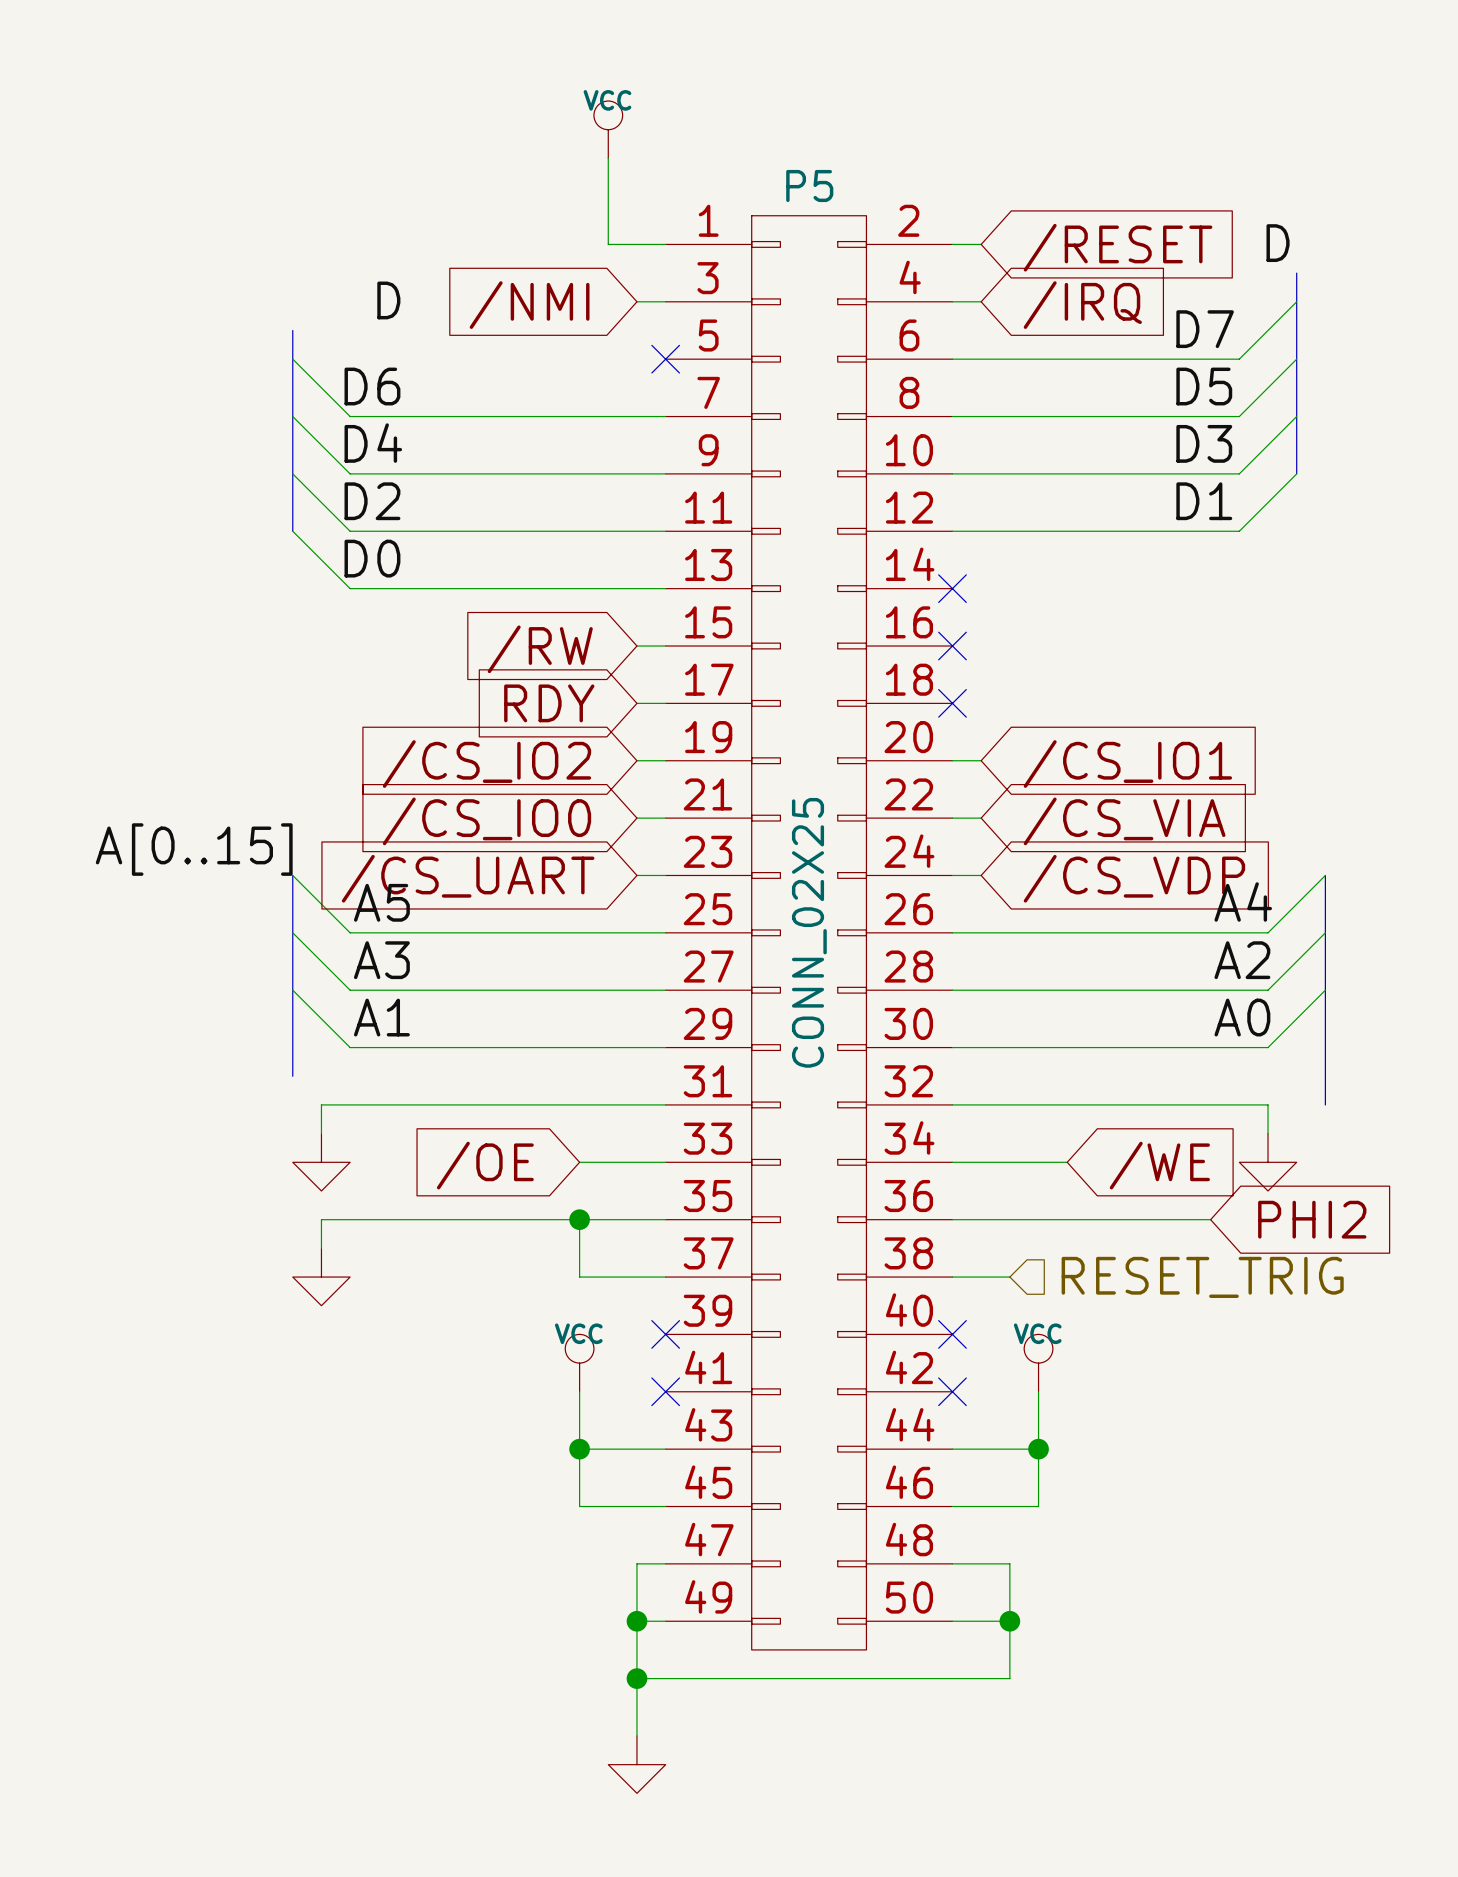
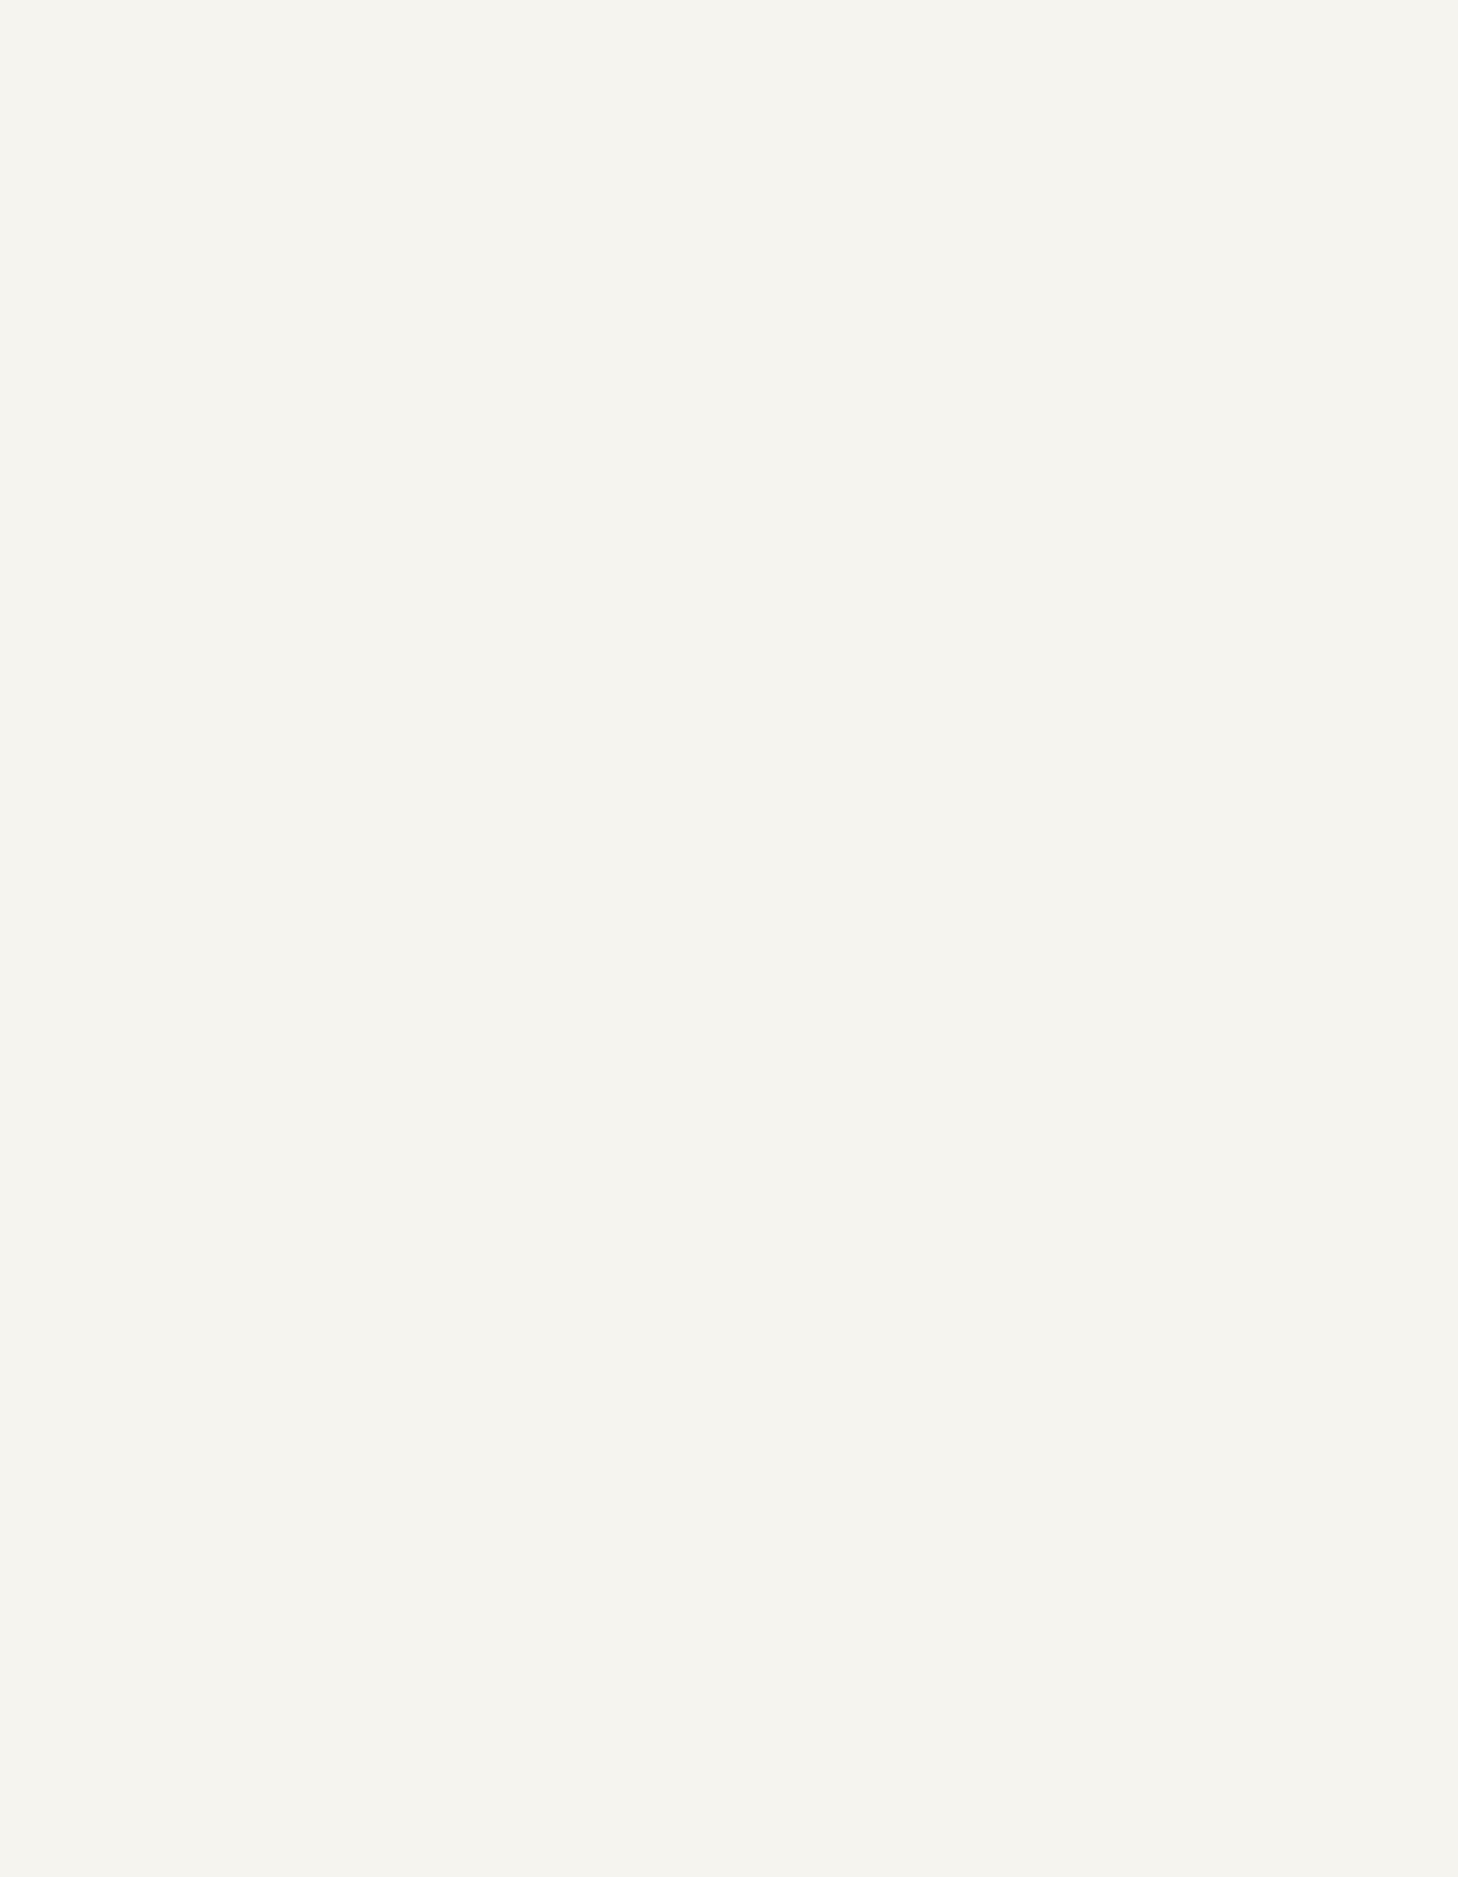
power symbol: VCC (608, 129) -> none
wire: (608, 158) (608, 244) (665, 244) -> none
label: D (1278, 243) -> none
wire: (952, 244) (981, 244) -> none
global label: /RESET (1118, 247) -> none
bus: (1296, 273) (1296, 473) -> none
label: D (388, 300) -> none
wire: (636, 301) (665, 301) -> none
wire: (952, 301) (981, 301) -> none
wire: (1296, 301) (1239, 359) (952, 359) -> none
global label: /NMI (529, 305) -> none
global label: /IRQ (1082, 305) -> none
label: D7 (1205, 329) -> none
bus: (292, 330) (292, 531) -> none
wire: (292, 359) (350, 416) (665, 416) -> none
no-connect mark: (665, 359) -> none
wire: (1296, 359) (1239, 416) (952, 416) -> none
label: D6 (372, 386) -> none
label: D5 (1204, 386) -> none
wire: (292, 416) (350, 473) (665, 473) -> none
wire: (1296, 416) (1239, 473) (952, 473) -> none
label: D4 (373, 443) -> none
label: D3 (1204, 443) -> none
wire: (292, 473) (350, 531) (665, 531) -> none
wire: (1296, 473) (1239, 531) (952, 531) -> none
label: D2 (372, 501) -> none
label: D1 (1204, 501) -> none
wire: (292, 531) (350, 588) (665, 588) -> none
label: D0 (372, 558) -> none
no-connect mark: (952, 588) -> none
wire: (636, 646) (665, 646) -> none
no-connect mark: (952, 646) -> none
global label: /RW (540, 649) -> none
global label: RDY (549, 703) -> none
wire: (636, 703) (665, 703) -> none
no-connect mark: (952, 703) -> none
wire: (636, 760) (665, 760) -> none
wire: (952, 760) (981, 760) -> none
global label: /CS_IO2 (486, 764) -> none
global label: /CS_IO1 (1127, 764) -> none
wire: (636, 818) (665, 818) -> none
wire: (952, 818) (981, 818) -> none
global label: /CS_IO0 (486, 821) -> none
global label: /CS_VIA (1124, 821) -> none
label: A[0..15] (194, 849) -> none
wire: (292, 875) (350, 932) (665, 932) -> none
bus: (292, 875) (292, 1076) -> none
wire: (636, 875) (665, 875) -> none
wire: (952, 875) (981, 875) -> none
wire: (1325, 875) (1268, 932) (952, 932) -> none
bus: (1325, 875) (1325, 1104) -> none
global label: /CS_UART (468, 878) -> none
global label: /CS_VDP (1134, 878) -> none
label: A4 (1243, 901) -> none
label: A5 (381, 902) -> none
wire: (292, 932) (350, 990) (665, 990) -> none
P5: CONN_02X25 (809, 932) -> none
wire: (1325, 932) (1268, 990) (952, 990) -> none
label: A3 (381, 960) -> none
label: A2 (1242, 960) -> none
wire: (292, 990) (350, 1047) (665, 1047) -> none
wire: (1325, 990) (1268, 1047) (952, 1047) -> none
label: A1 (381, 1017) -> none
label: A0 (1242, 1017) -> none
wire: (665, 1104) (321, 1104) (321, 1133) -> none
wire: (952, 1104) (1268, 1104) (1268, 1133) -> none
power symbol: (321, 1162) -> none
wire: (579, 1162) (665, 1162) -> none
wire: (952, 1162) (1067, 1162) -> none
power symbol: (1268, 1162) -> none
global label: /OE (485, 1165) -> none
global label: /WE (1159, 1165) -> none
wire: (579, 1219) (579, 1277) (665, 1277) -> none
junction: (579, 1219) -> none
wire: (665, 1219) (321, 1219) (321, 1248) -> none
wire: (952, 1219) (1210, 1219) -> none
global label: PHI2 (1312, 1219) -> none
power symbol: (321, 1277) -> none
wire: (952, 1277) (1009, 1277) -> none
hierarchical label: RESET_TRIG (1202, 1277) -> none
no-connect mark: (665, 1334) -> none
no-connect mark: (952, 1334) -> none
power symbol: VCC (579, 1363) -> none
power symbol: VCC (1038, 1363) -> none
wire: (579, 1391) (579, 1506) (665, 1506) -> none
no-connect mark: (665, 1391) -> none
no-connect mark: (952, 1391) -> none
wire: (1038, 1391) (1038, 1506) (952, 1506) -> none
wire: (579, 1449) (665, 1449) -> none
junction: (579, 1449) -> none
wire: (952, 1449) (1038, 1449) -> none
junction: (1038, 1449) -> none
wire: (665, 1563) (636, 1563) (636, 1735) -> none
wire: (952, 1563) (1009, 1563) (1009, 1678) (636, 1678) -> none
wire: (636, 1621) (665, 1621) -> none
junction: (636, 1621) -> none
wire: (952, 1621) (1009, 1621) -> none
junction: (1009, 1621) -> none
junction: (636, 1678) -> none
power symbol: (636, 1764) -> none

